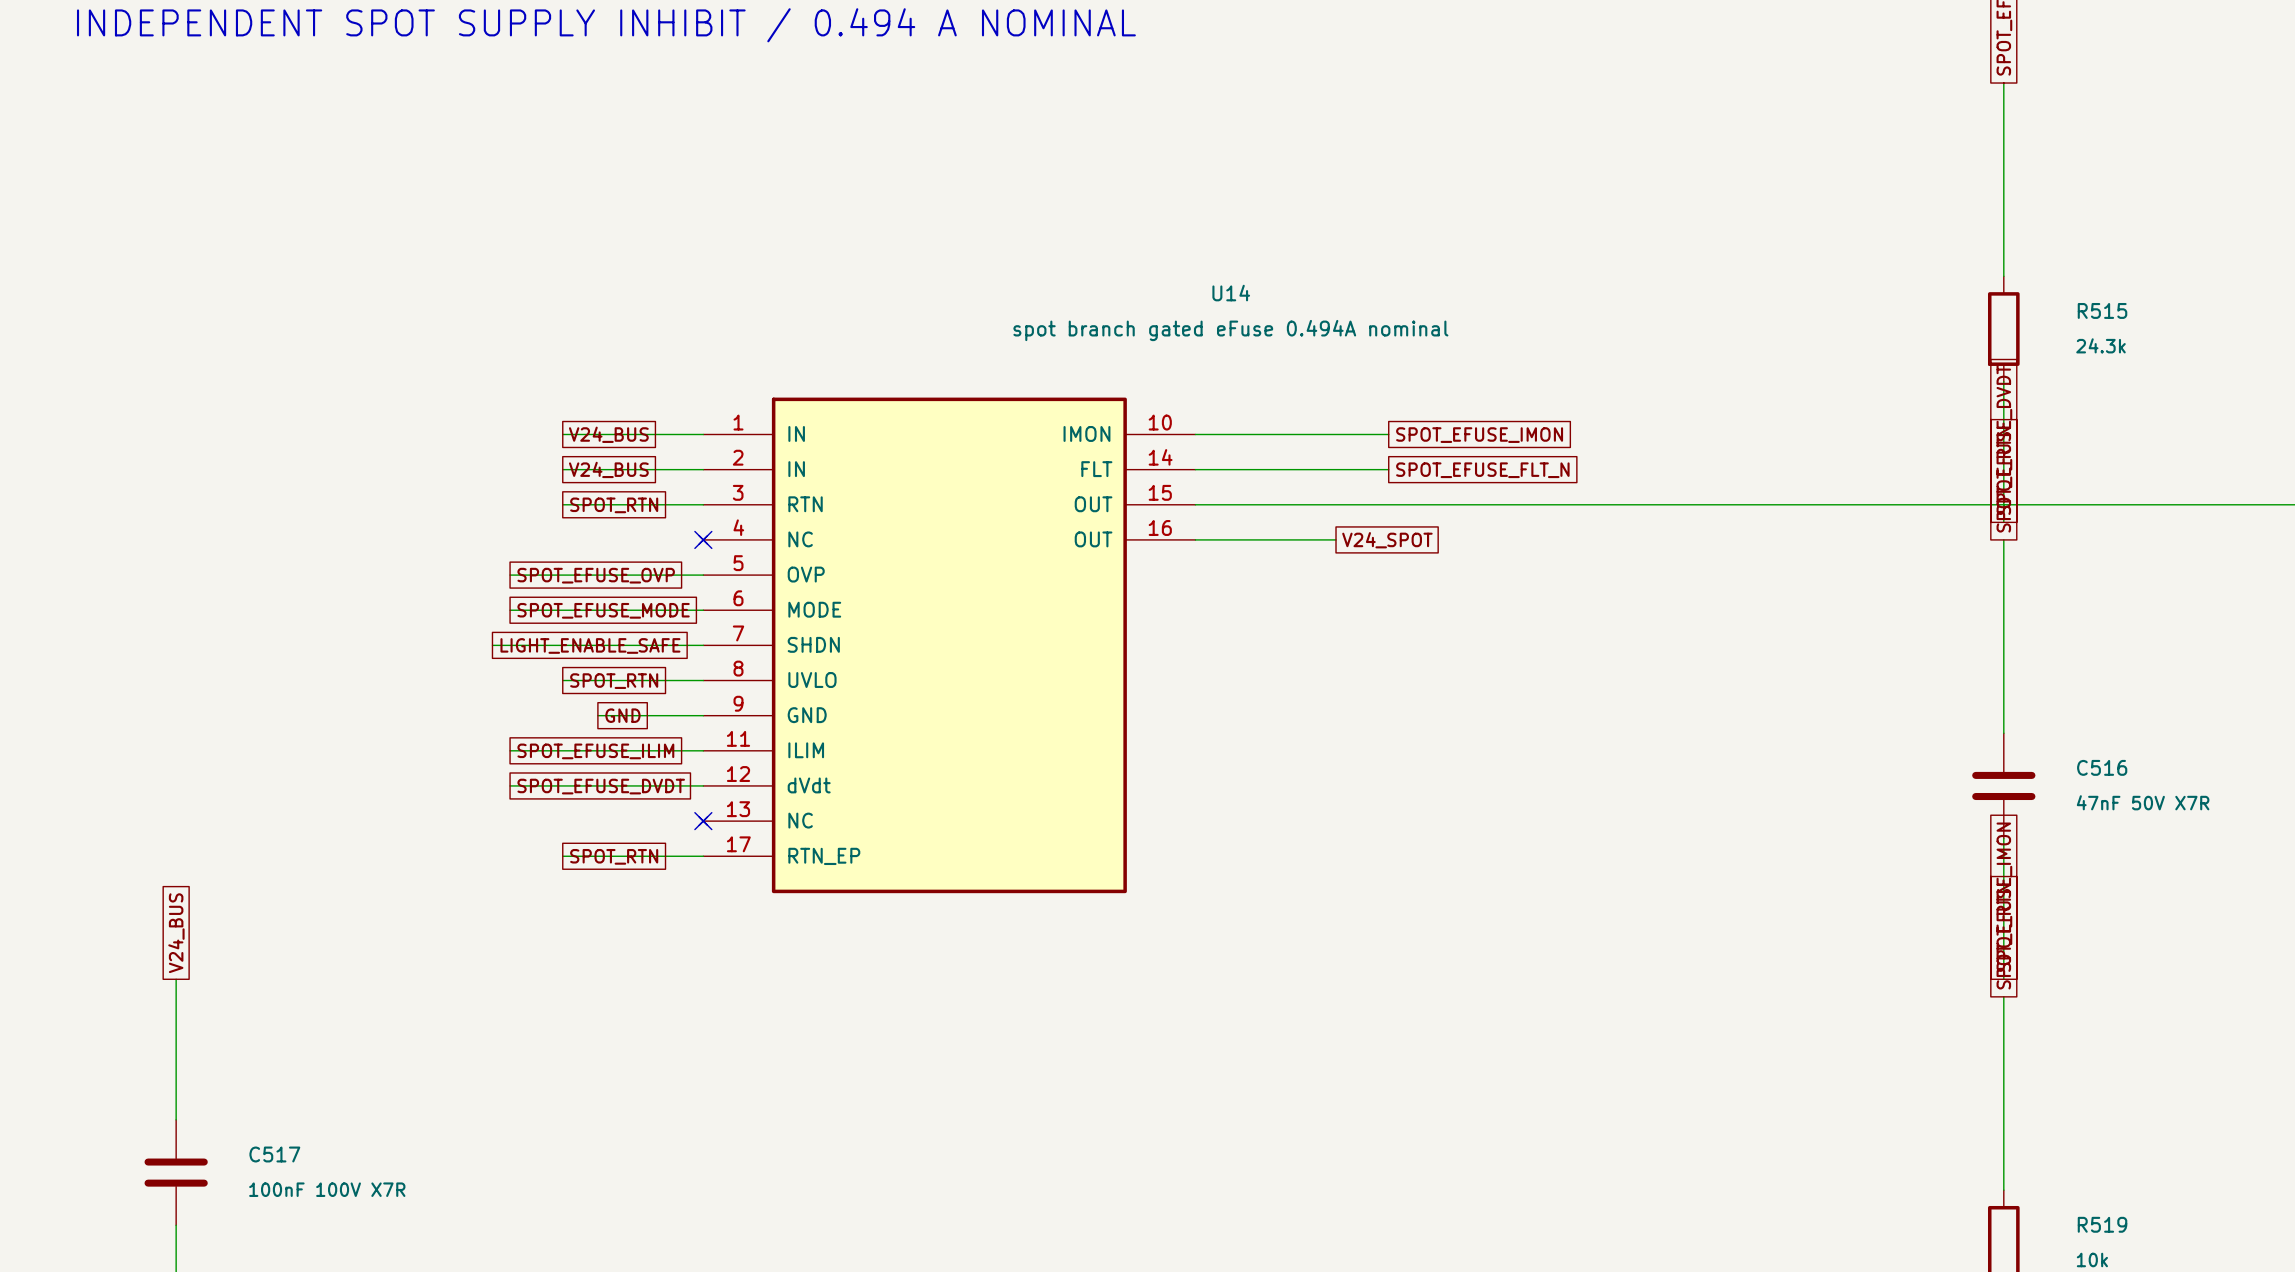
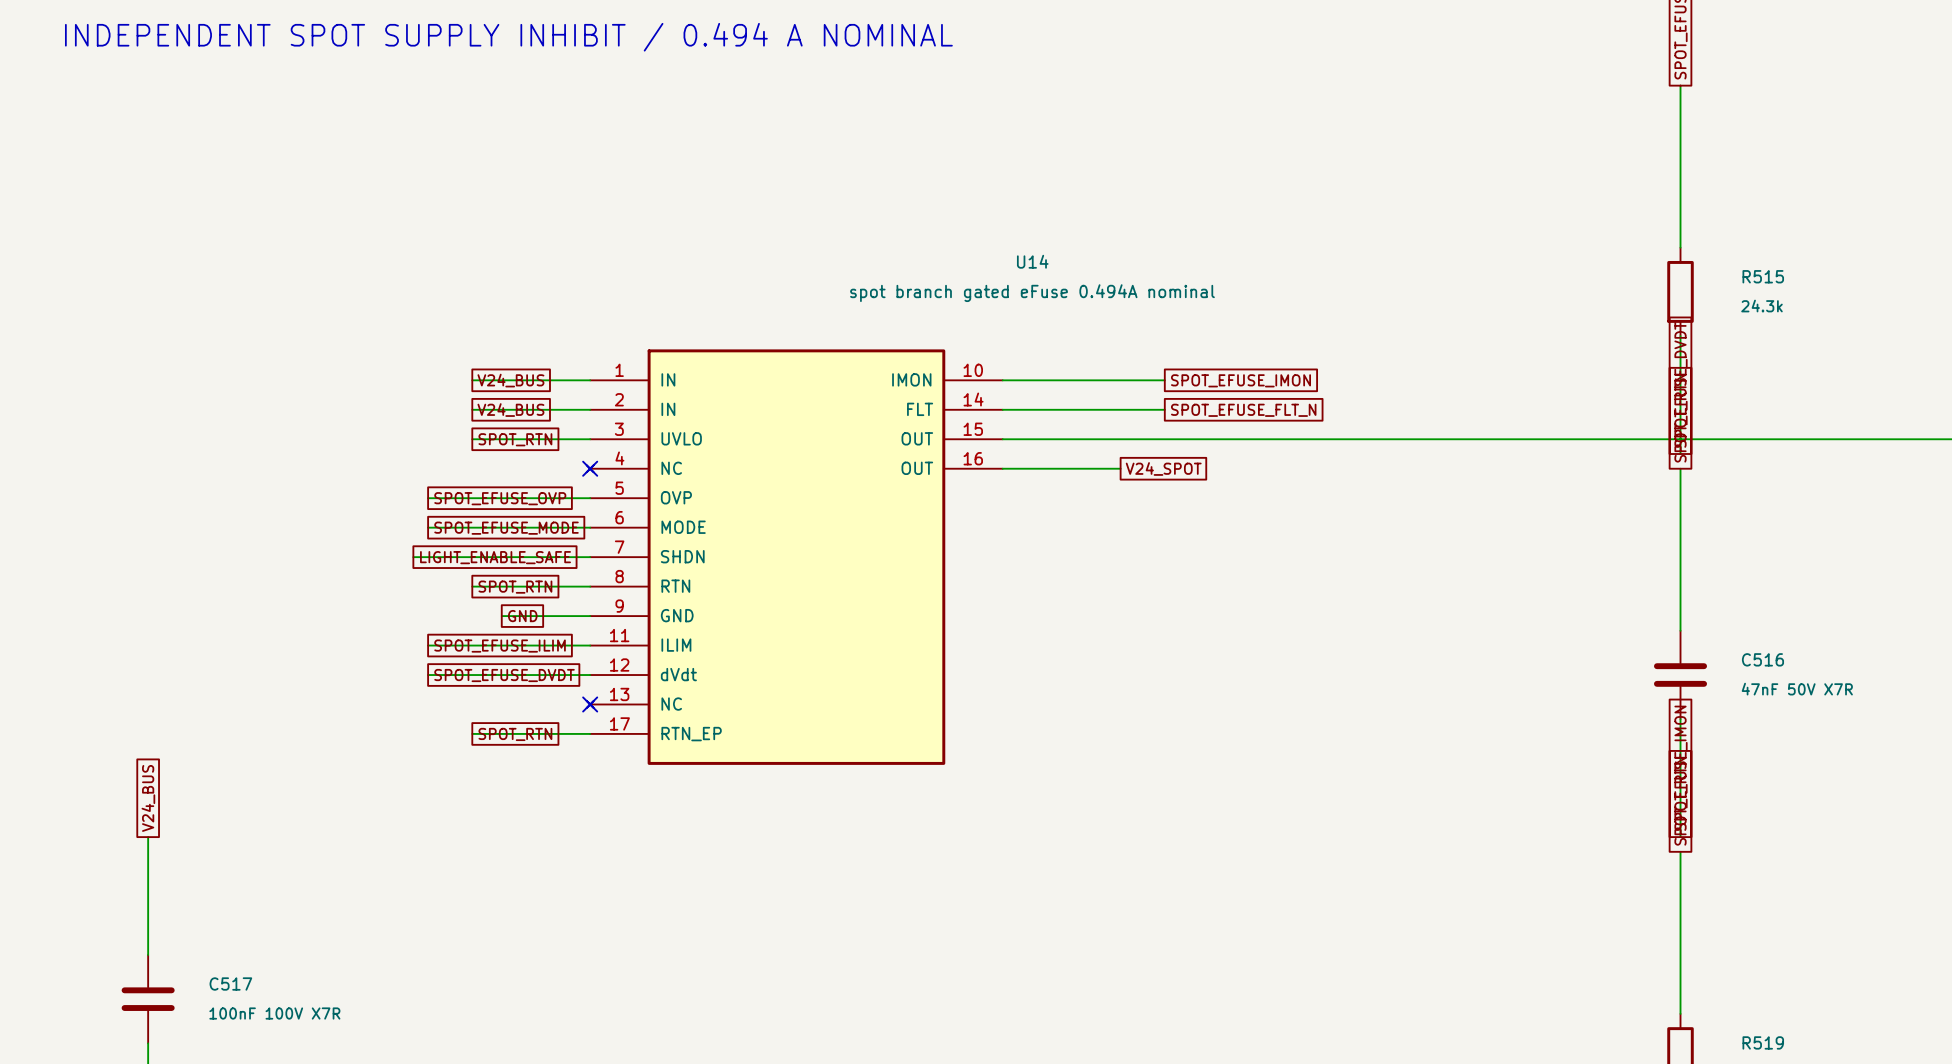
U14 pin name: RTN (805, 504) -> UVLO (681, 438)
U14 pin name: UVLO (812, 680) -> RTN (675, 586)

